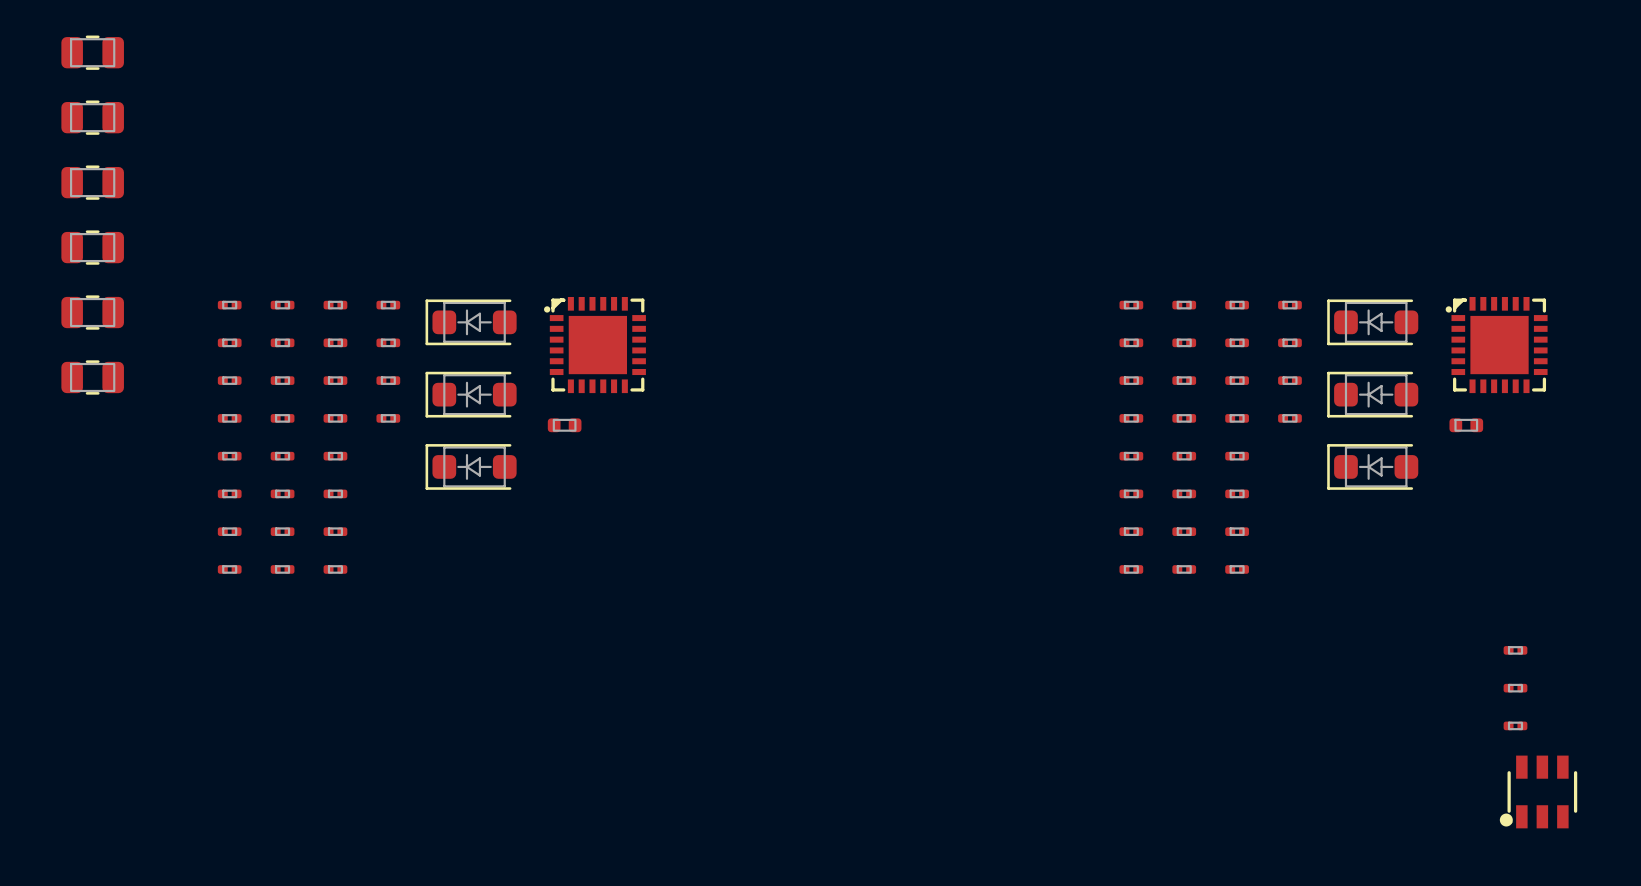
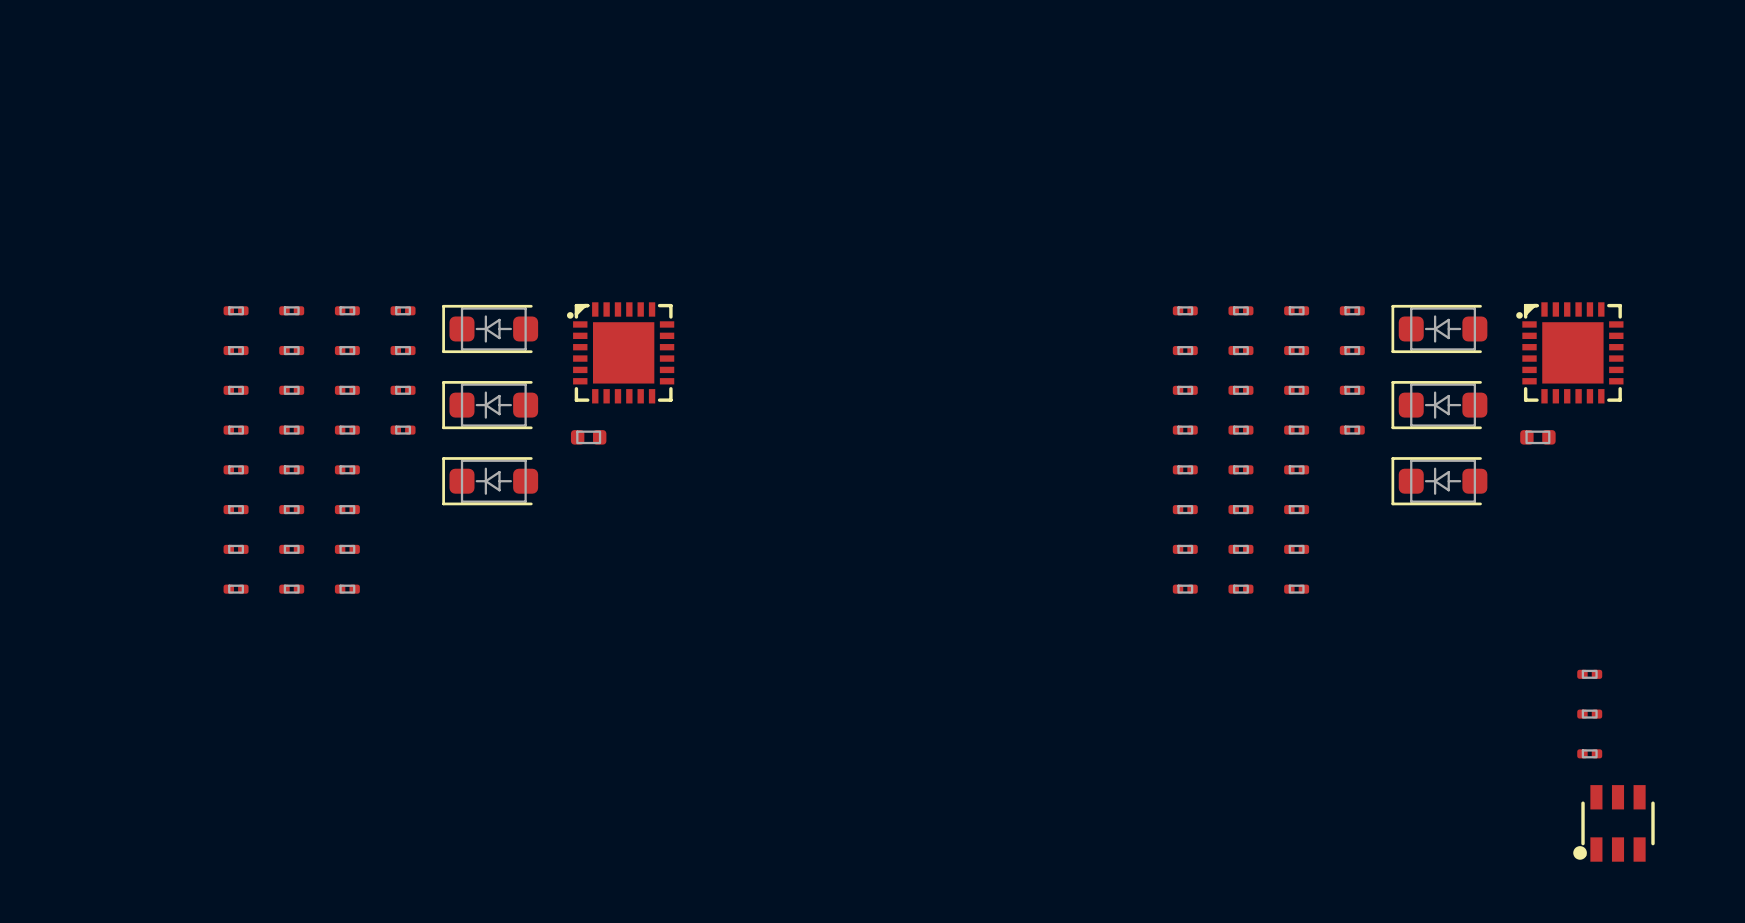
part: (92, 52) -> none
part: (92, 117) -> none
part: (92, 182) -> none
part: (92, 247) -> none
part: (92, 312) -> none
part: (92, 377) -> none

